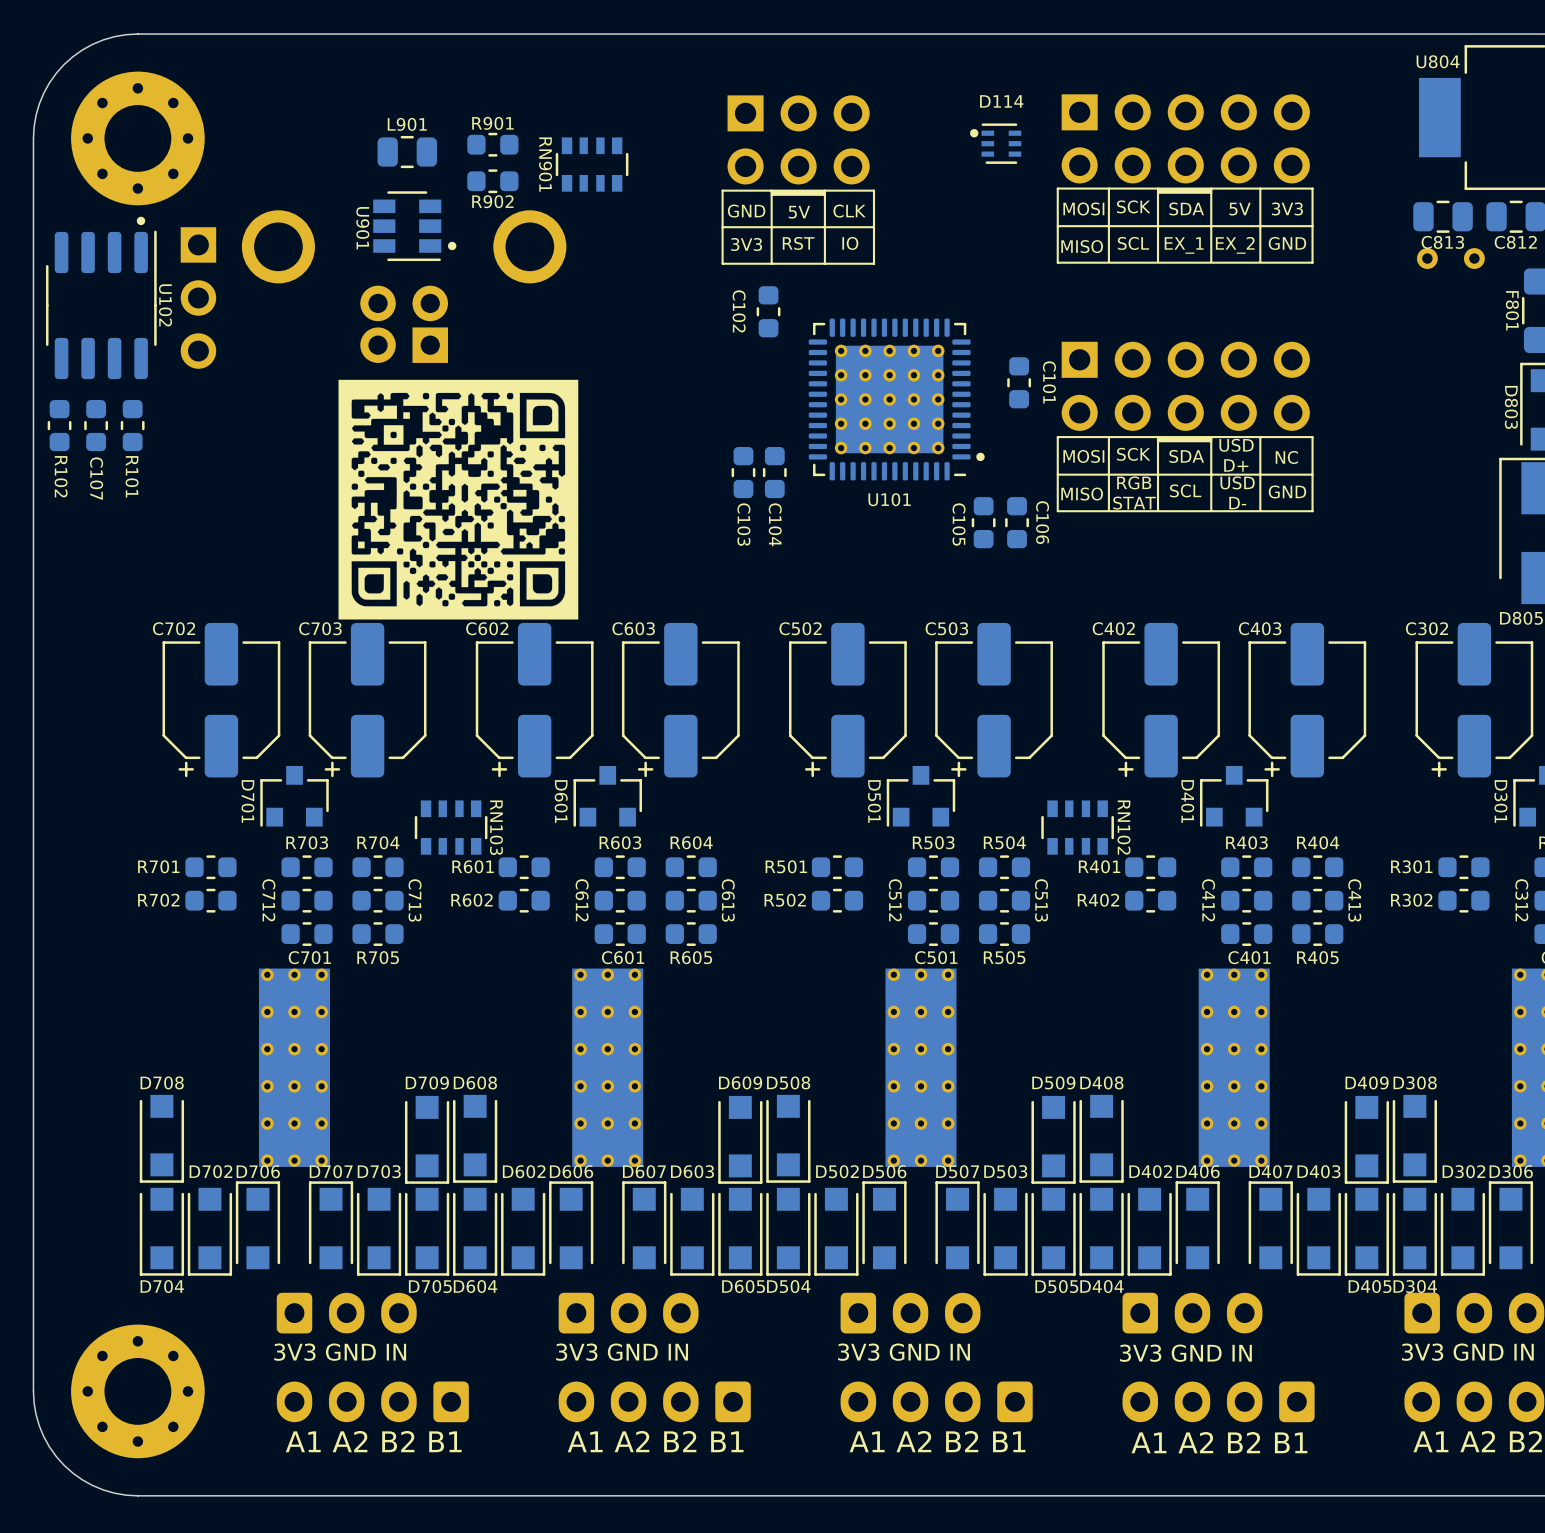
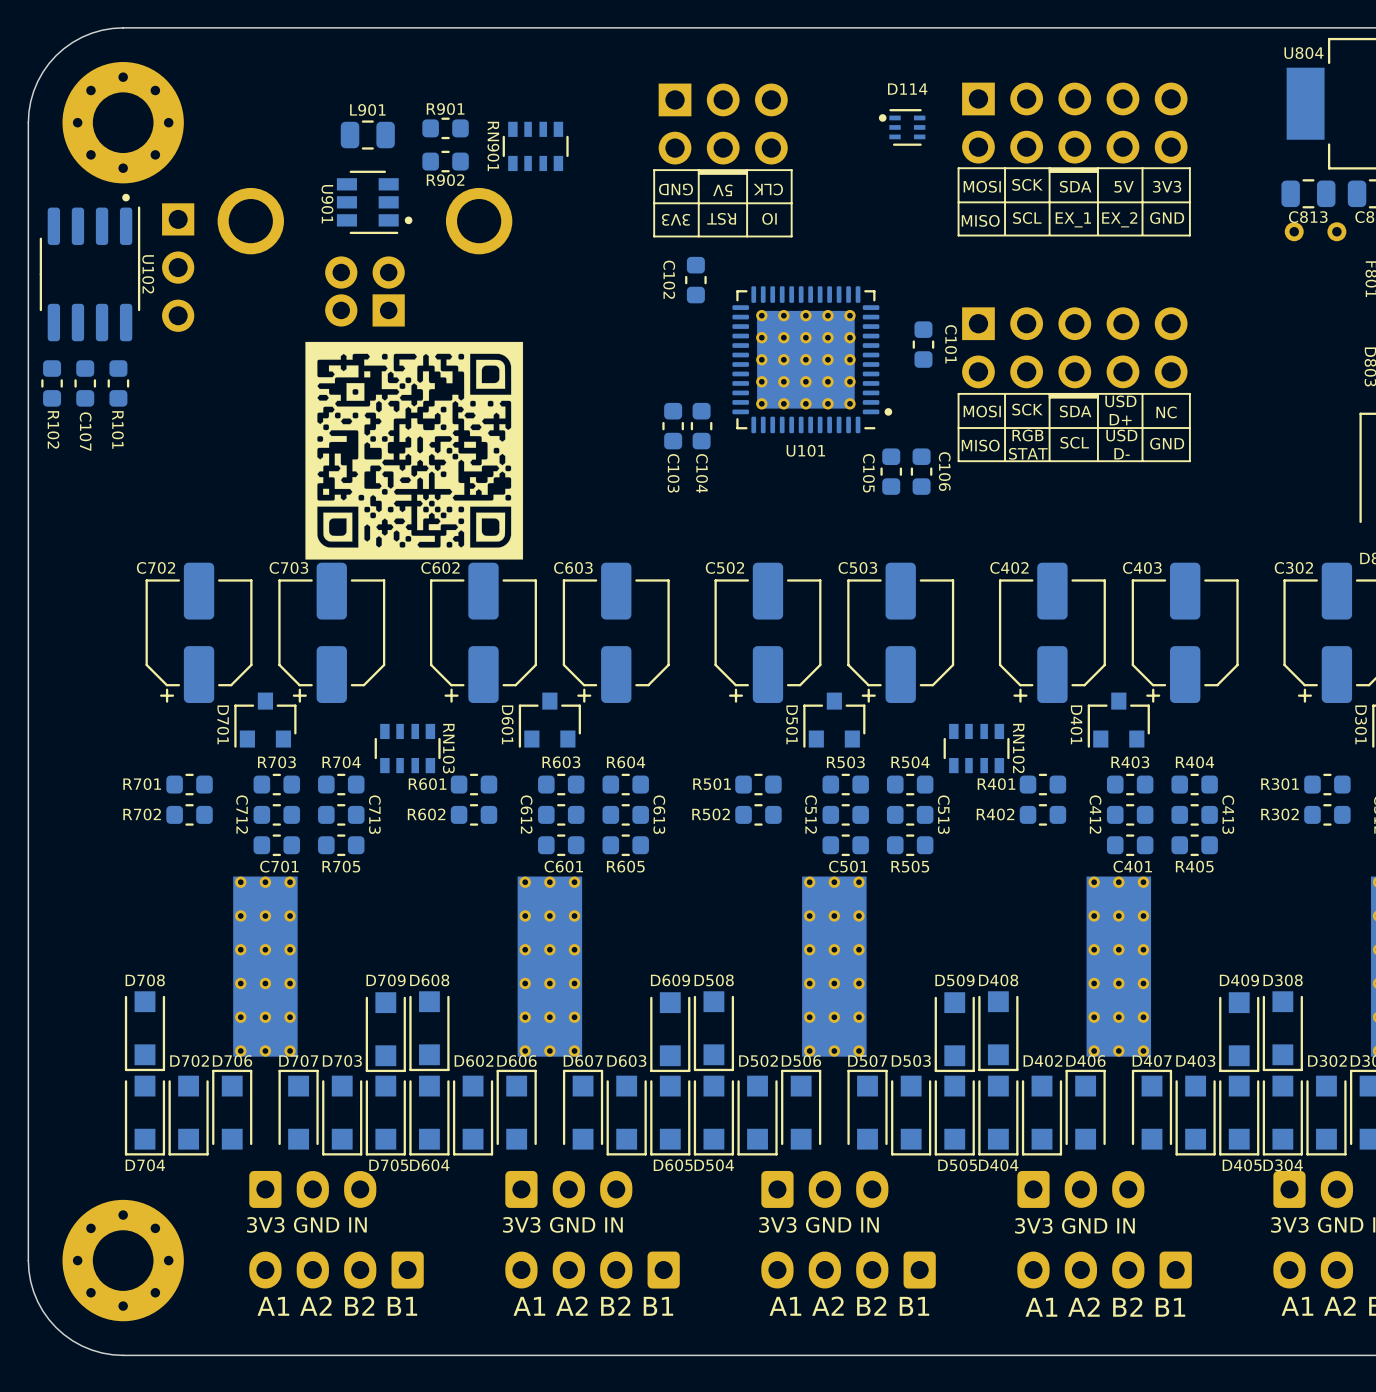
text rotation: 0° (746, 211) -> 180° (676, 189)
text rotation: 0° (849, 211) -> 180° (768, 189)
text rotation: 0° (799, 212) -> 180° (722, 190)
text rotation: 0° (798, 243) -> 180° (721, 218)
text rotation: 0° (850, 243) -> 180° (769, 218)
text rotation: 0° (746, 244) -> 180° (676, 219)

